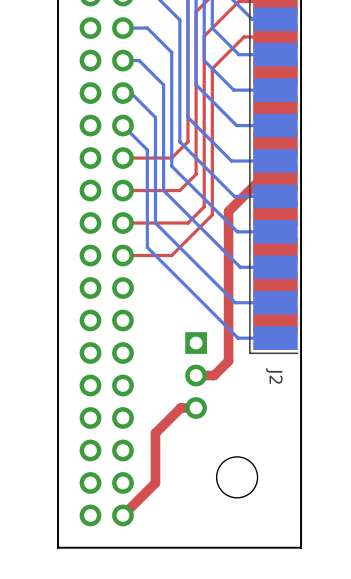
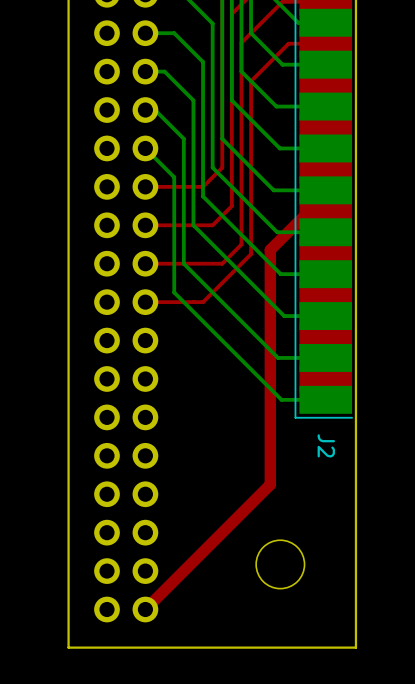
top track: (228, 361) (214, 375) (196, 375) -> none
part: (196, 375) -> none
top track: (196, 408) (180, 408) (155, 433) (155, 482) -> (270, 427) (270, 484) (183, 571)

